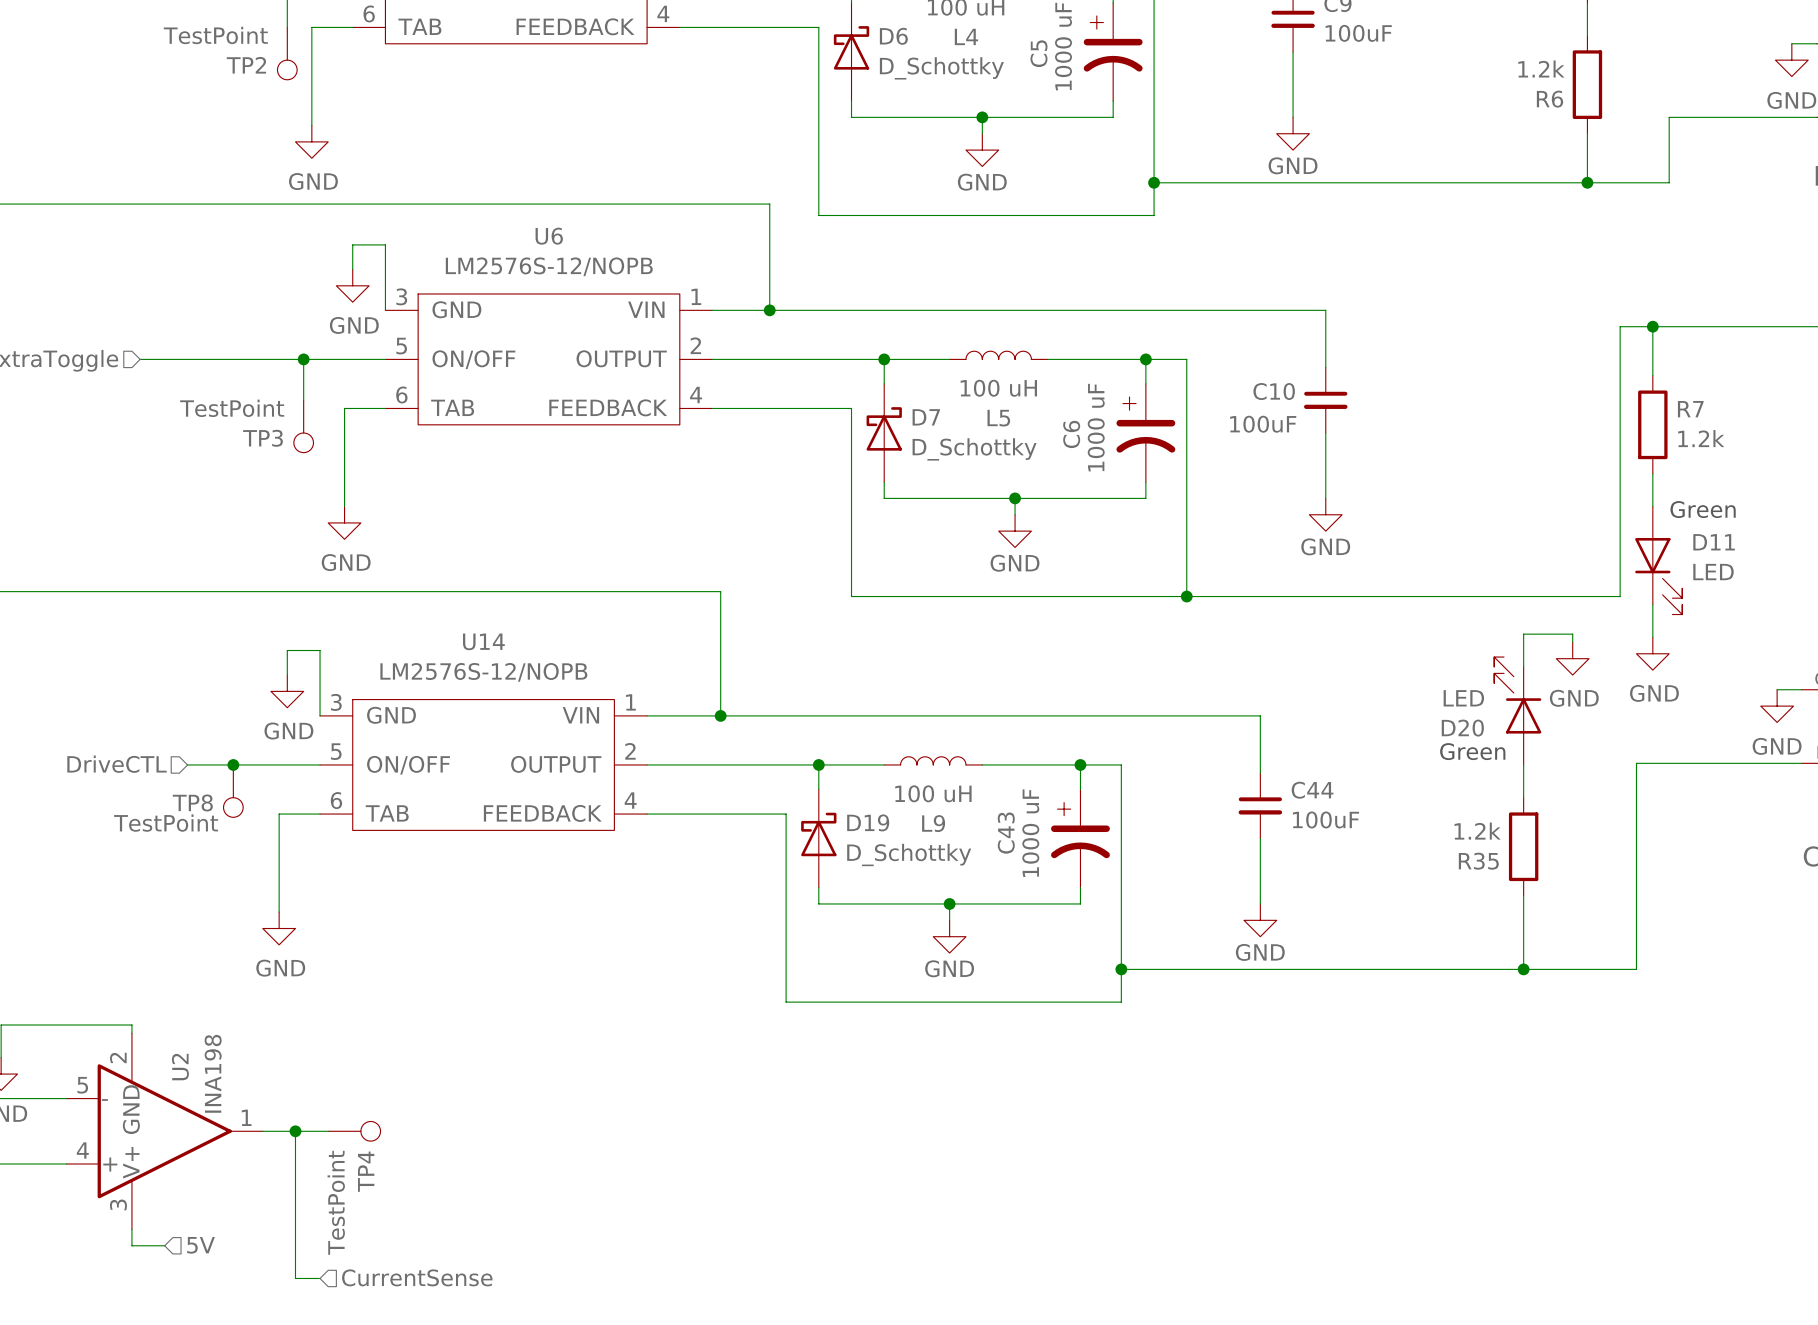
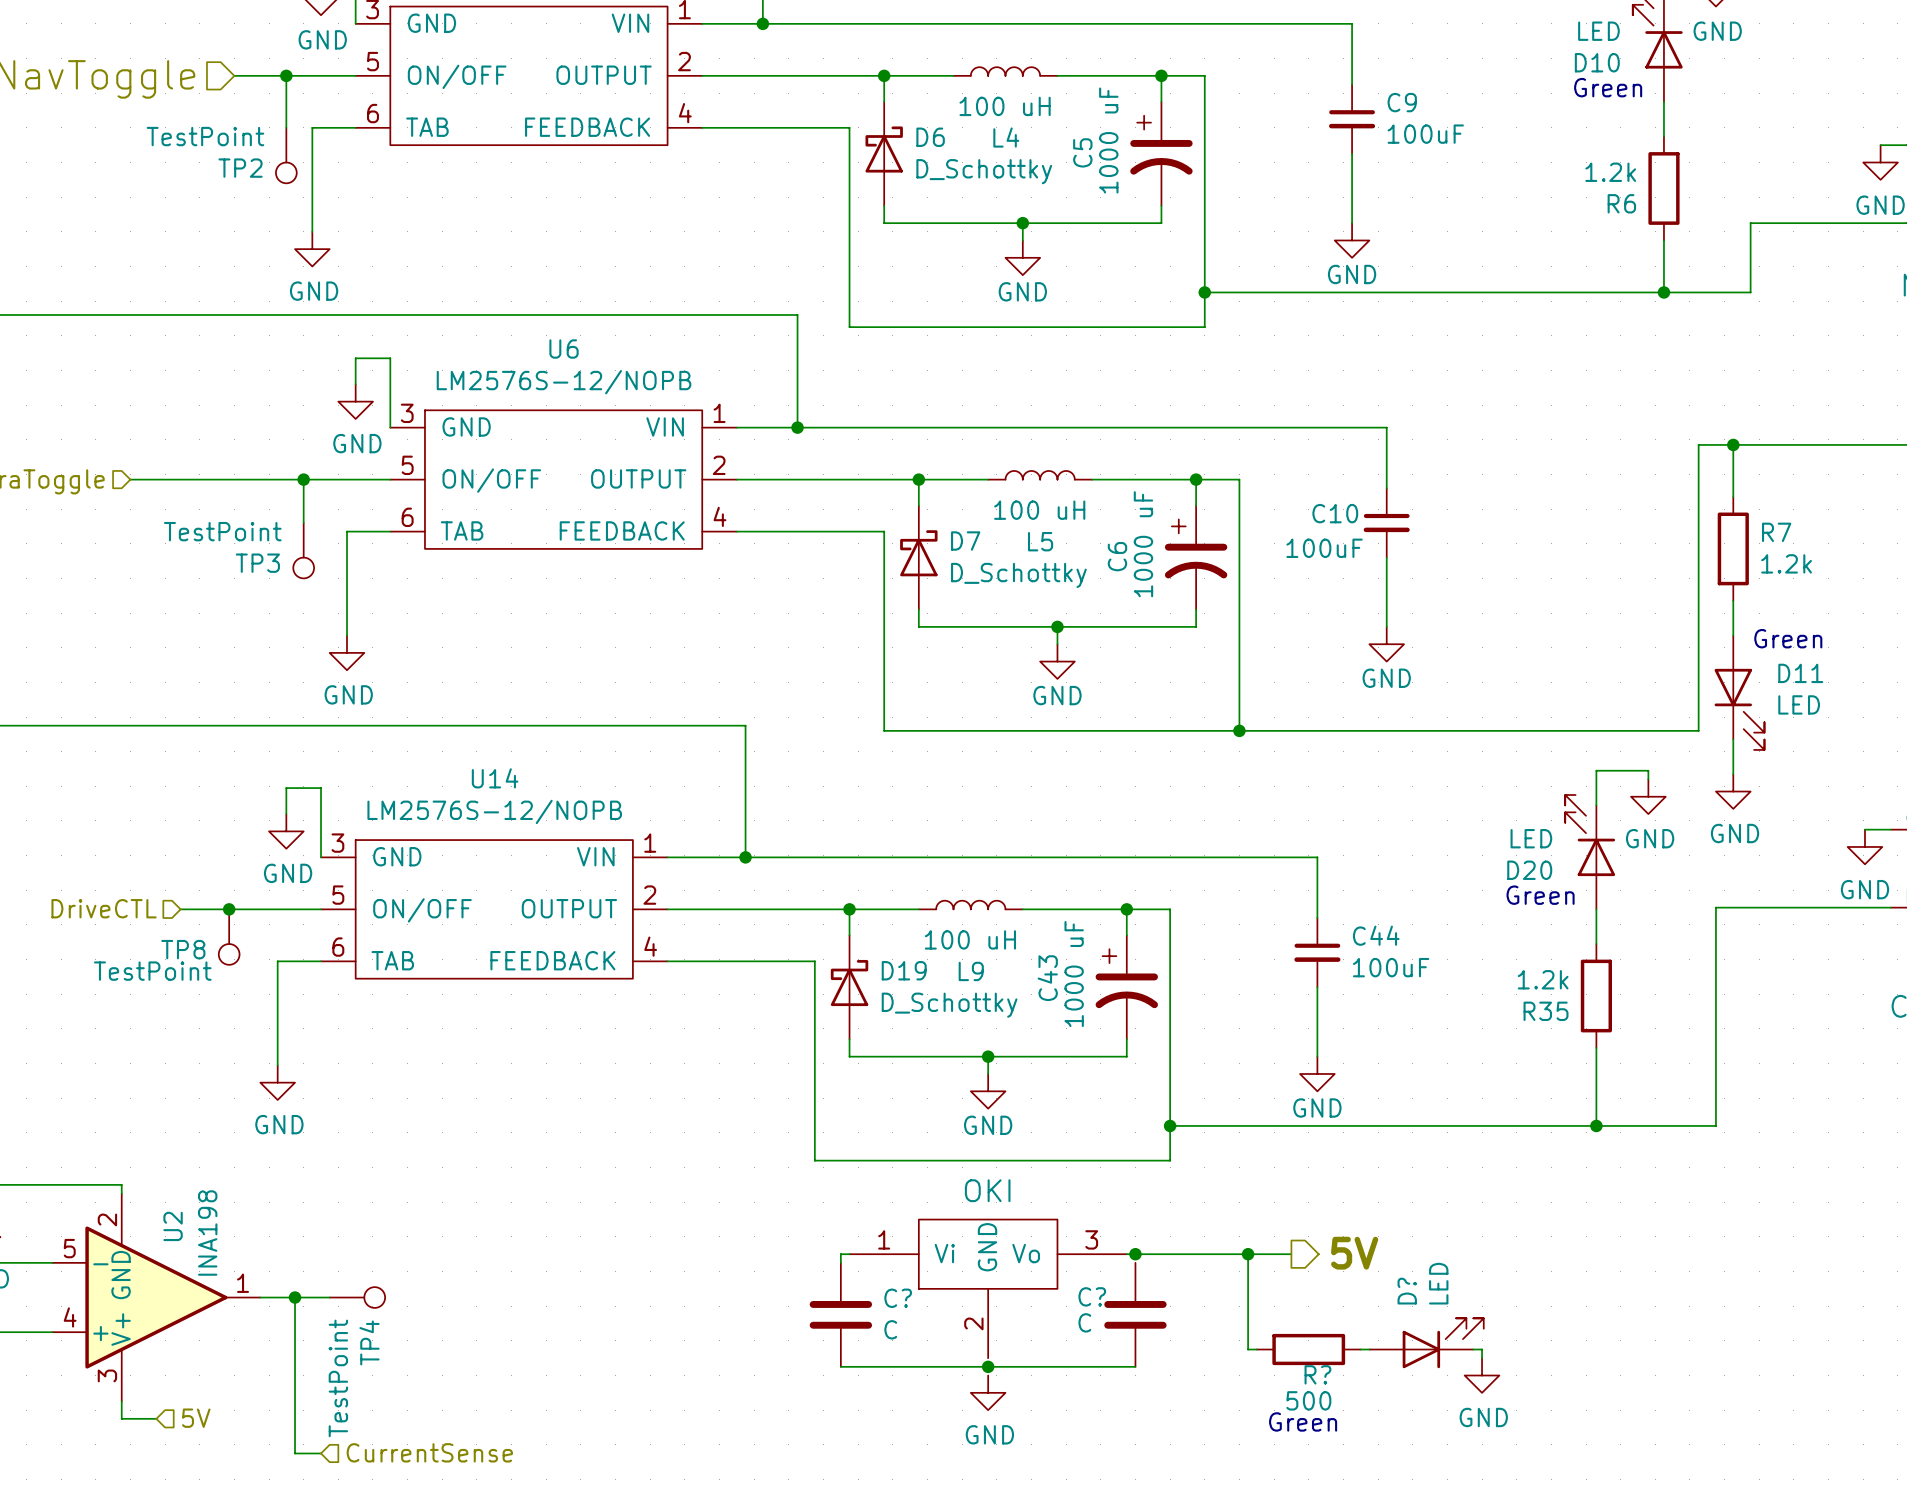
hierarchical label: none -> 5V (1354, 1253)
wire: none -> (849, 1254) (840, 1254) (840, 1262)
wire: none -> (1126, 1254) (1291, 1254)
junction: none -> (1135, 1254)
wire: none -> (1248, 1254) (1248, 1349) (1256, 1349)
junction: none -> (1248, 1254)
part: none -> OKI (988, 1288)
C?: none -> C (840, 1314)
C?: none -> C (1135, 1314)
D?: none -> LED (1426, 1343)
R?: none -> 500 (1308, 1349)
wire: none -> (1360, 1349) (1369, 1349)
wire: none -> (1473, 1349) (1482, 1349) (1482, 1358)
wire: none -> (840, 1366) (1135, 1366)
junction: none -> (988, 1366)
power symbol: none -> GND (1482, 1375)
power symbol: none -> GND (988, 1392)
text: none -> Green (1303, 1421)

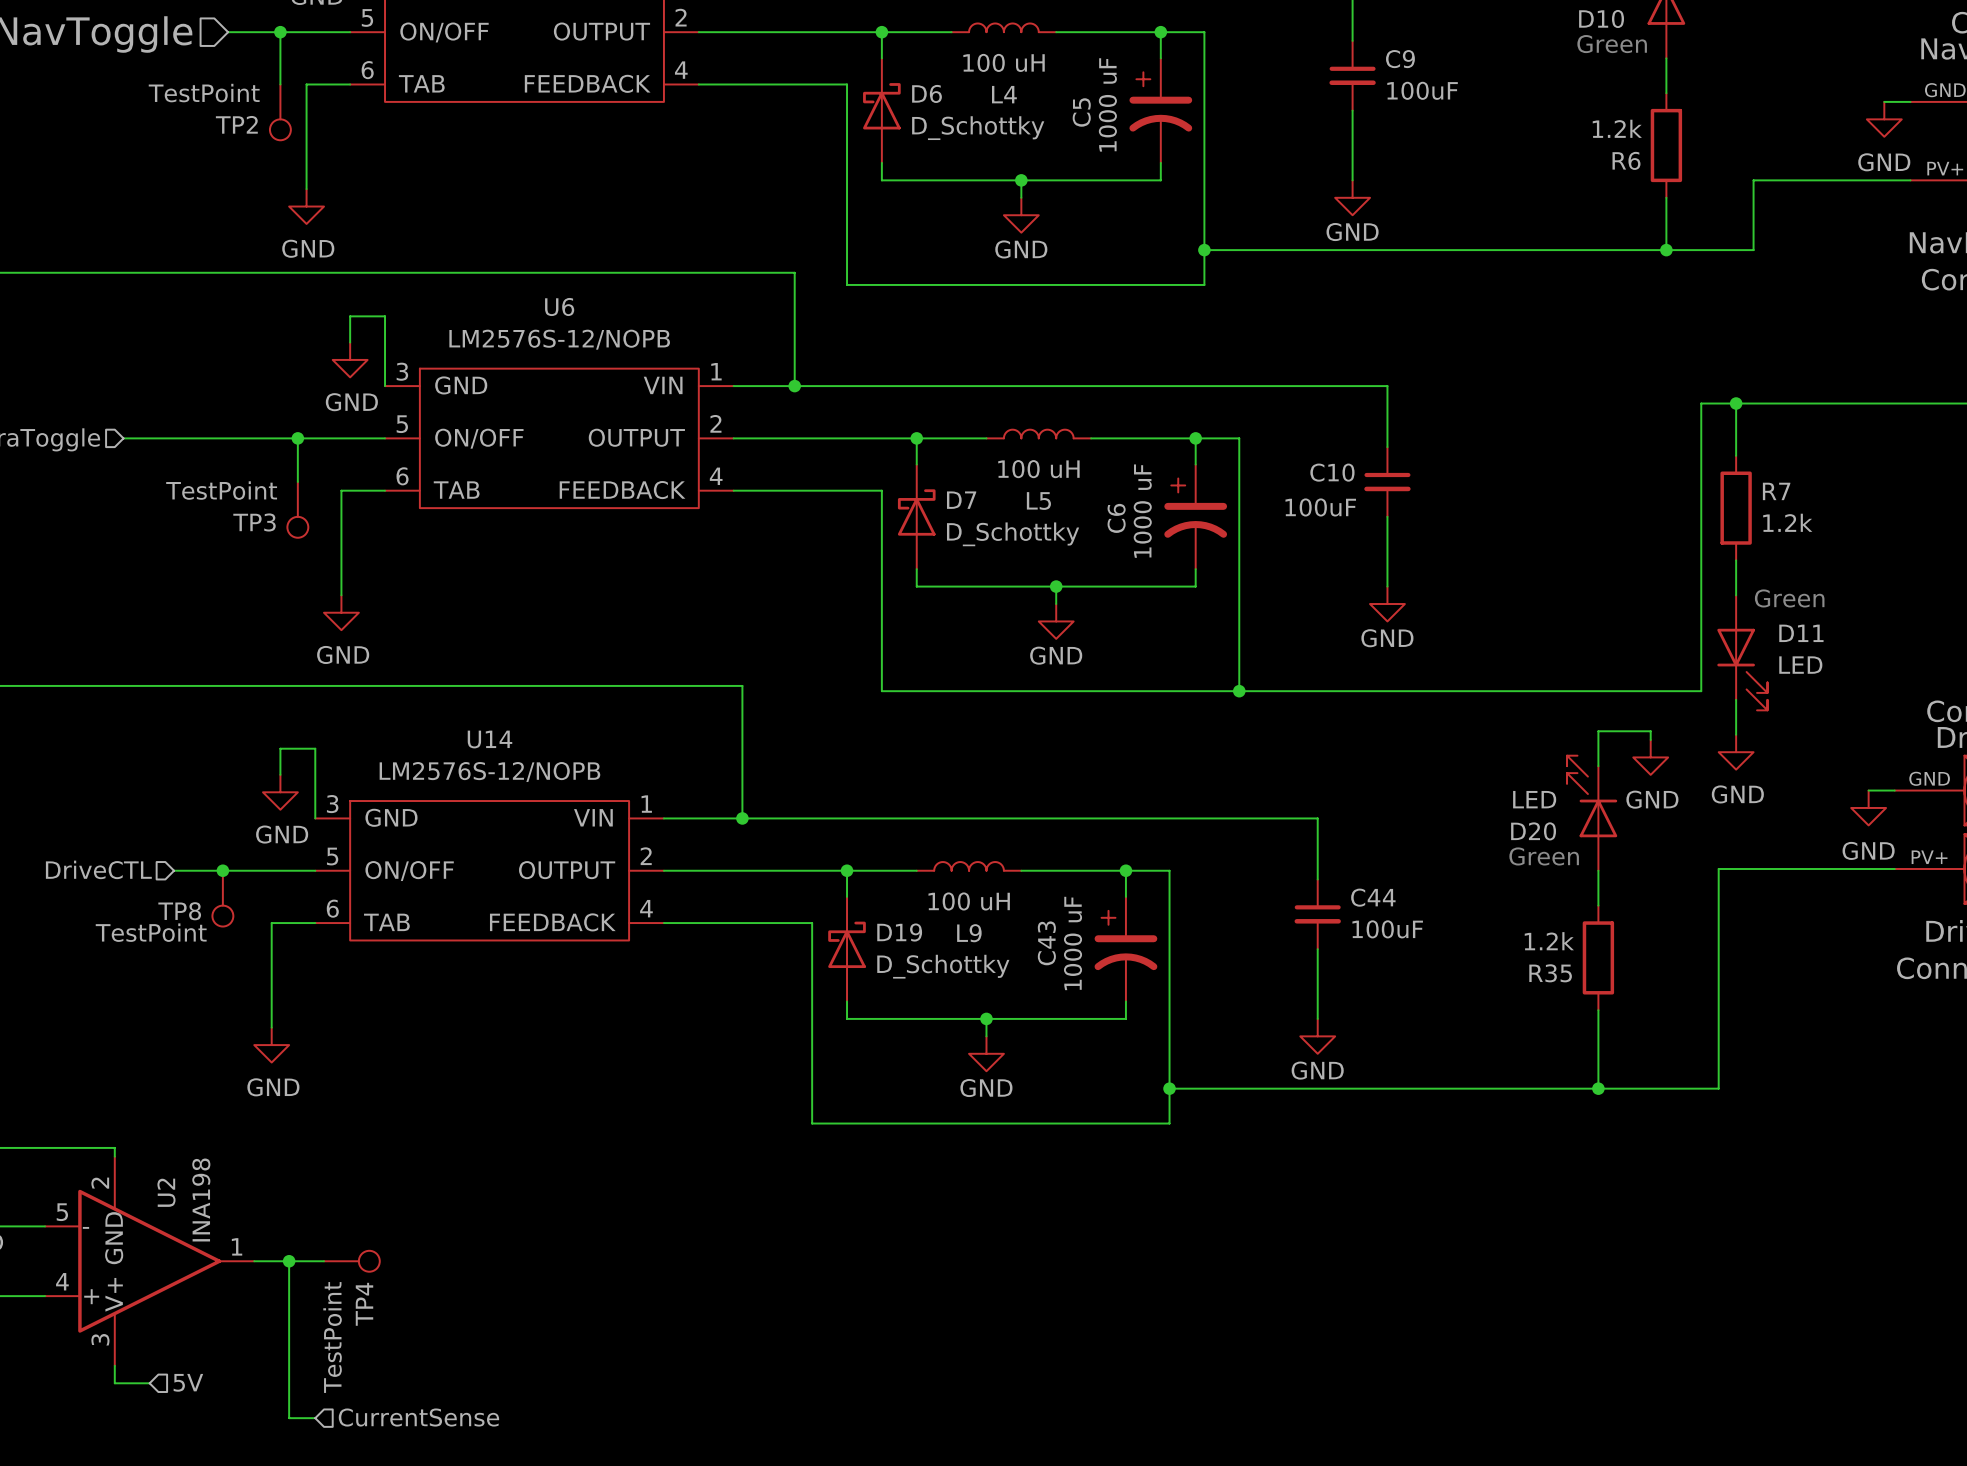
hierarchical label: 5V (1354, 1253) -> none
wire: (849, 1254) (840, 1254) (840, 1262) -> none
wire: (1126, 1254) (1291, 1254) -> none
junction: (1135, 1254) -> none
wire: (1248, 1254) (1248, 1349) (1256, 1349) -> none
junction: (1248, 1254) -> none
part: OKI (988, 1288) -> none
C?: C (840, 1314) -> none
C?: C (1135, 1314) -> none
D?: LED (1426, 1343) -> none
R?: 500 (1308, 1349) -> none
wire: (1360, 1349) (1369, 1349) -> none
wire: (1473, 1349) (1482, 1349) (1482, 1358) -> none
wire: (840, 1366) (1135, 1366) -> none
junction: (988, 1366) -> none
power symbol: GND (1482, 1375) -> none
power symbol: GND (988, 1392) -> none
text: Green (1303, 1421) -> none

